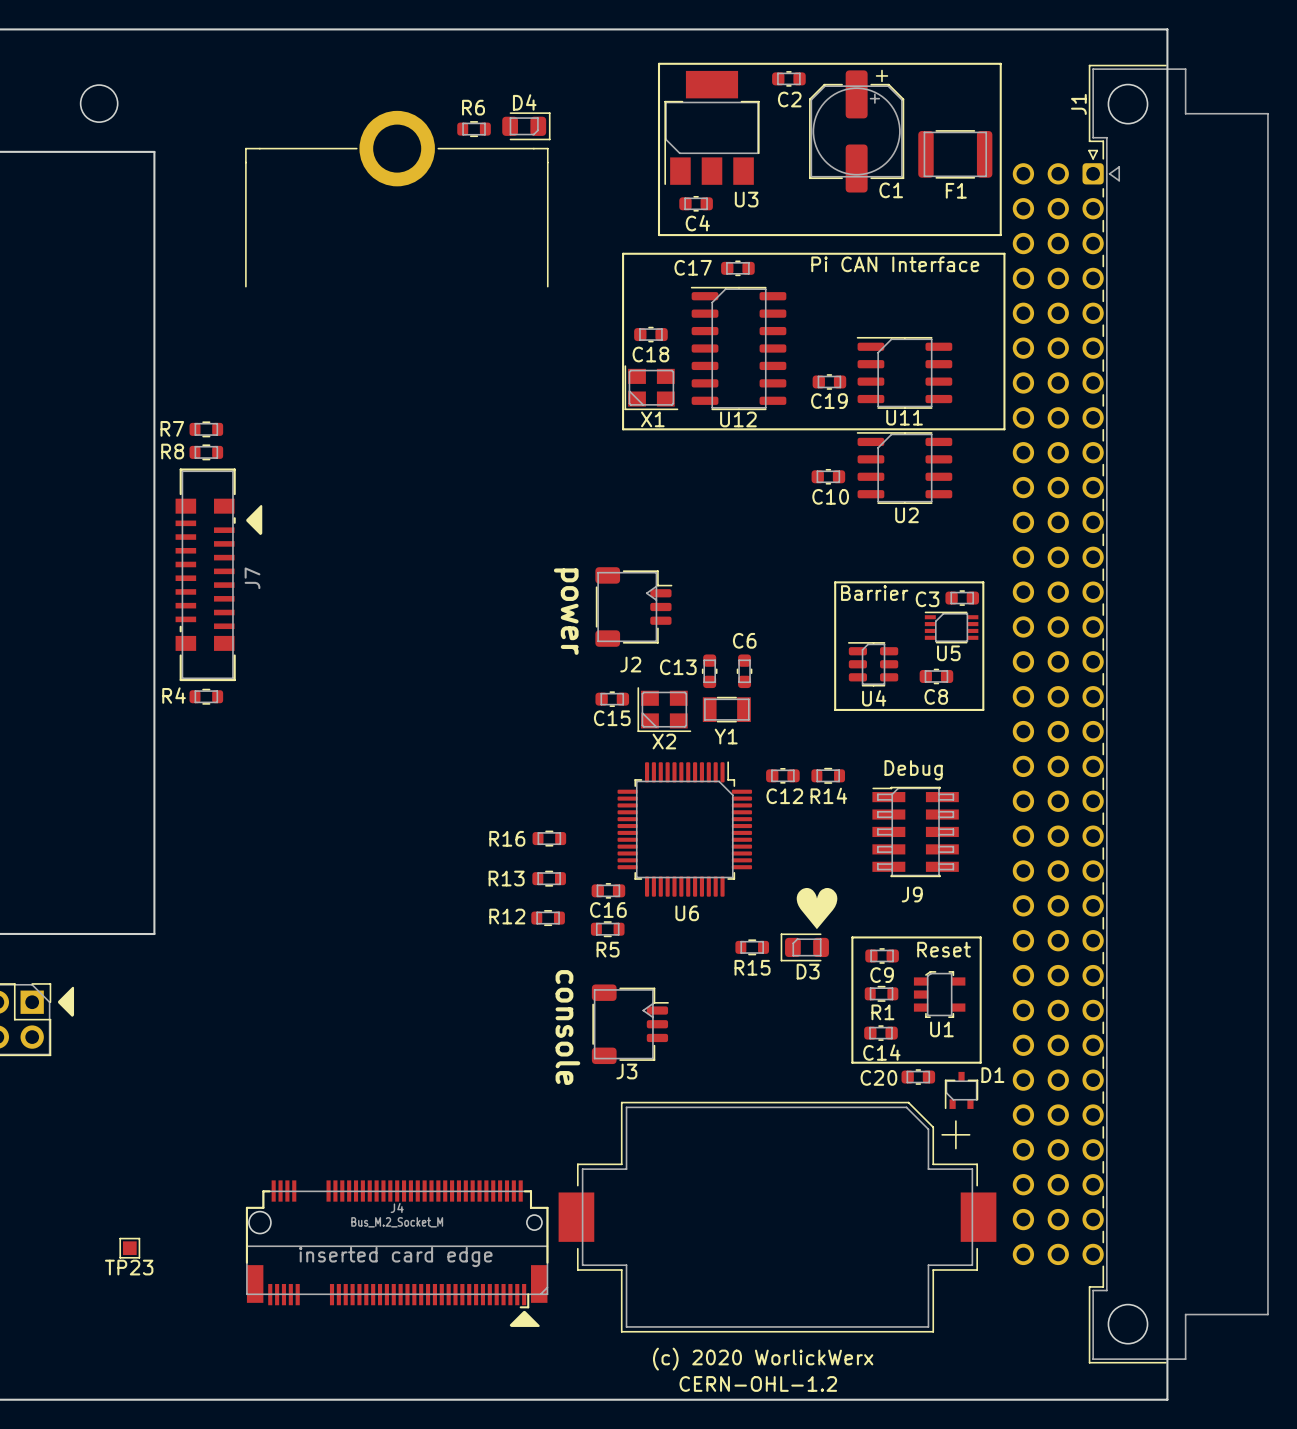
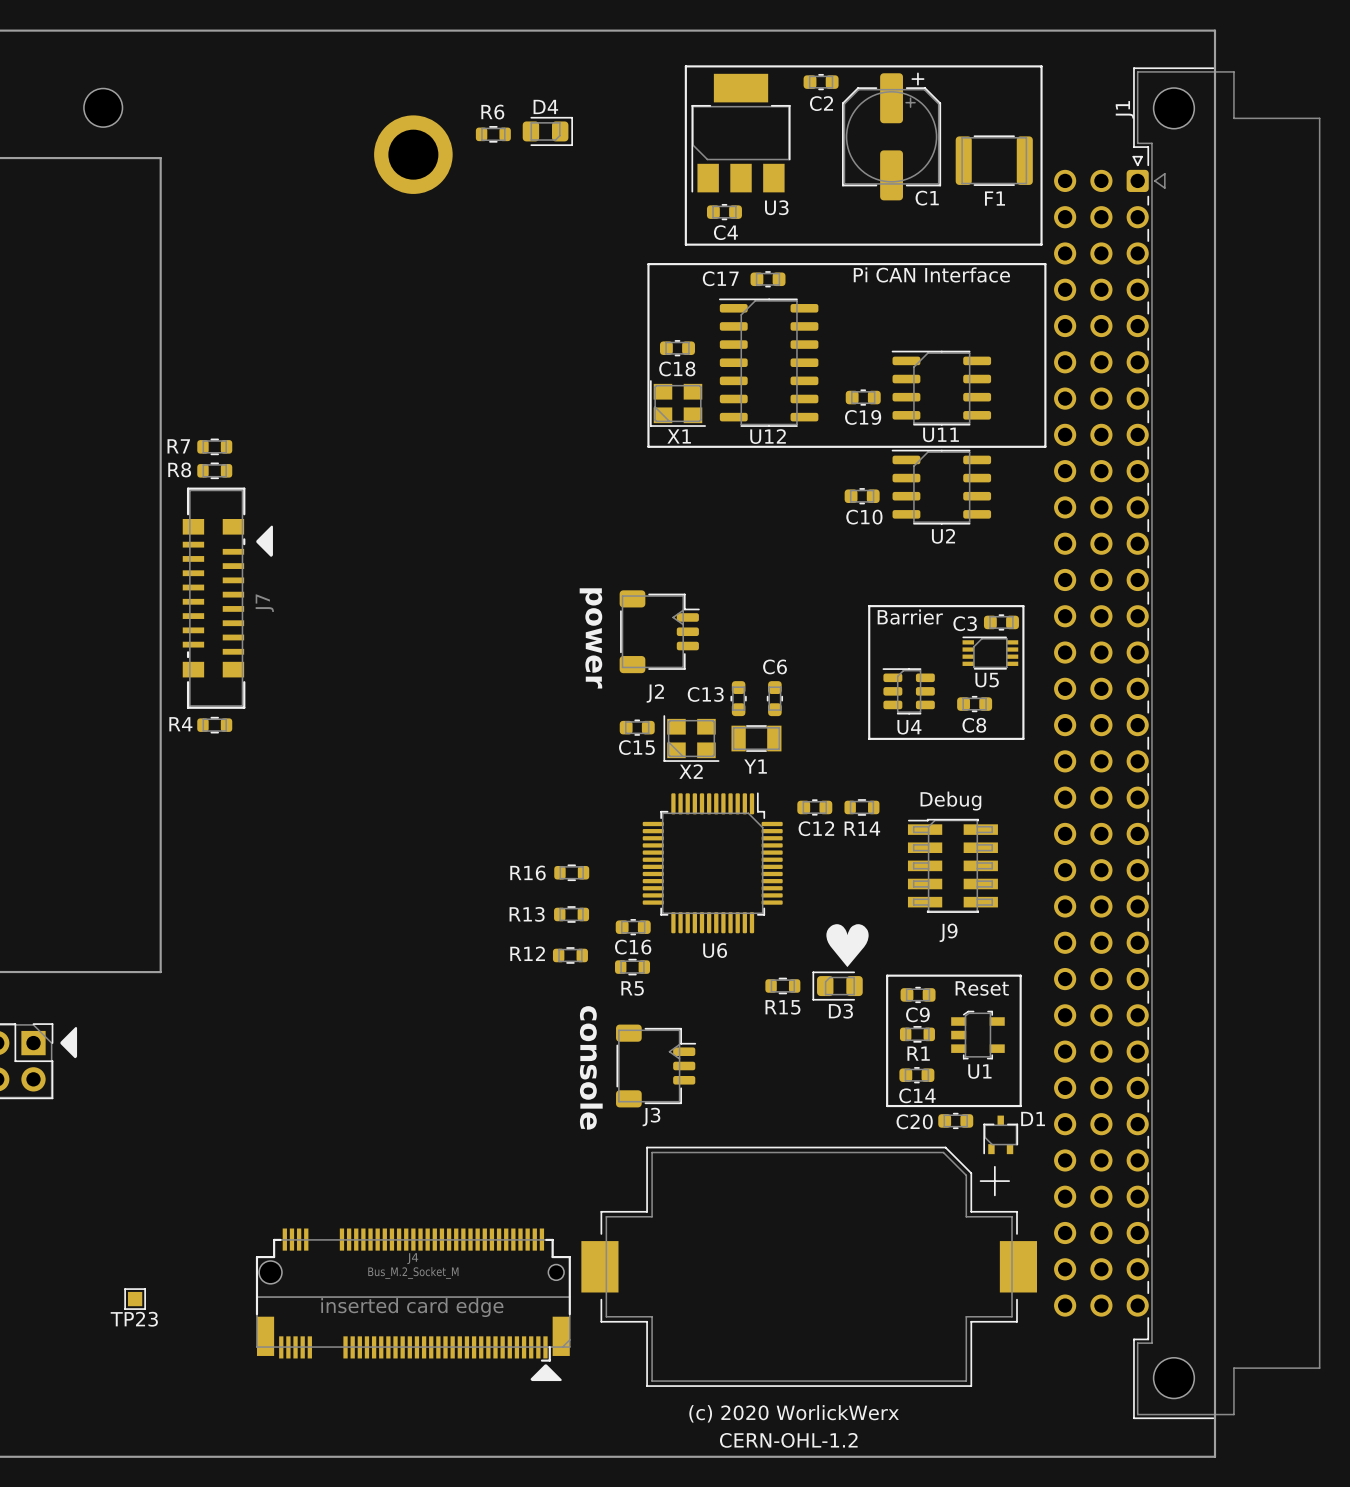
J4 footprint: [245, 110, 549, 1309] -> [255, 115, 571, 1362]

